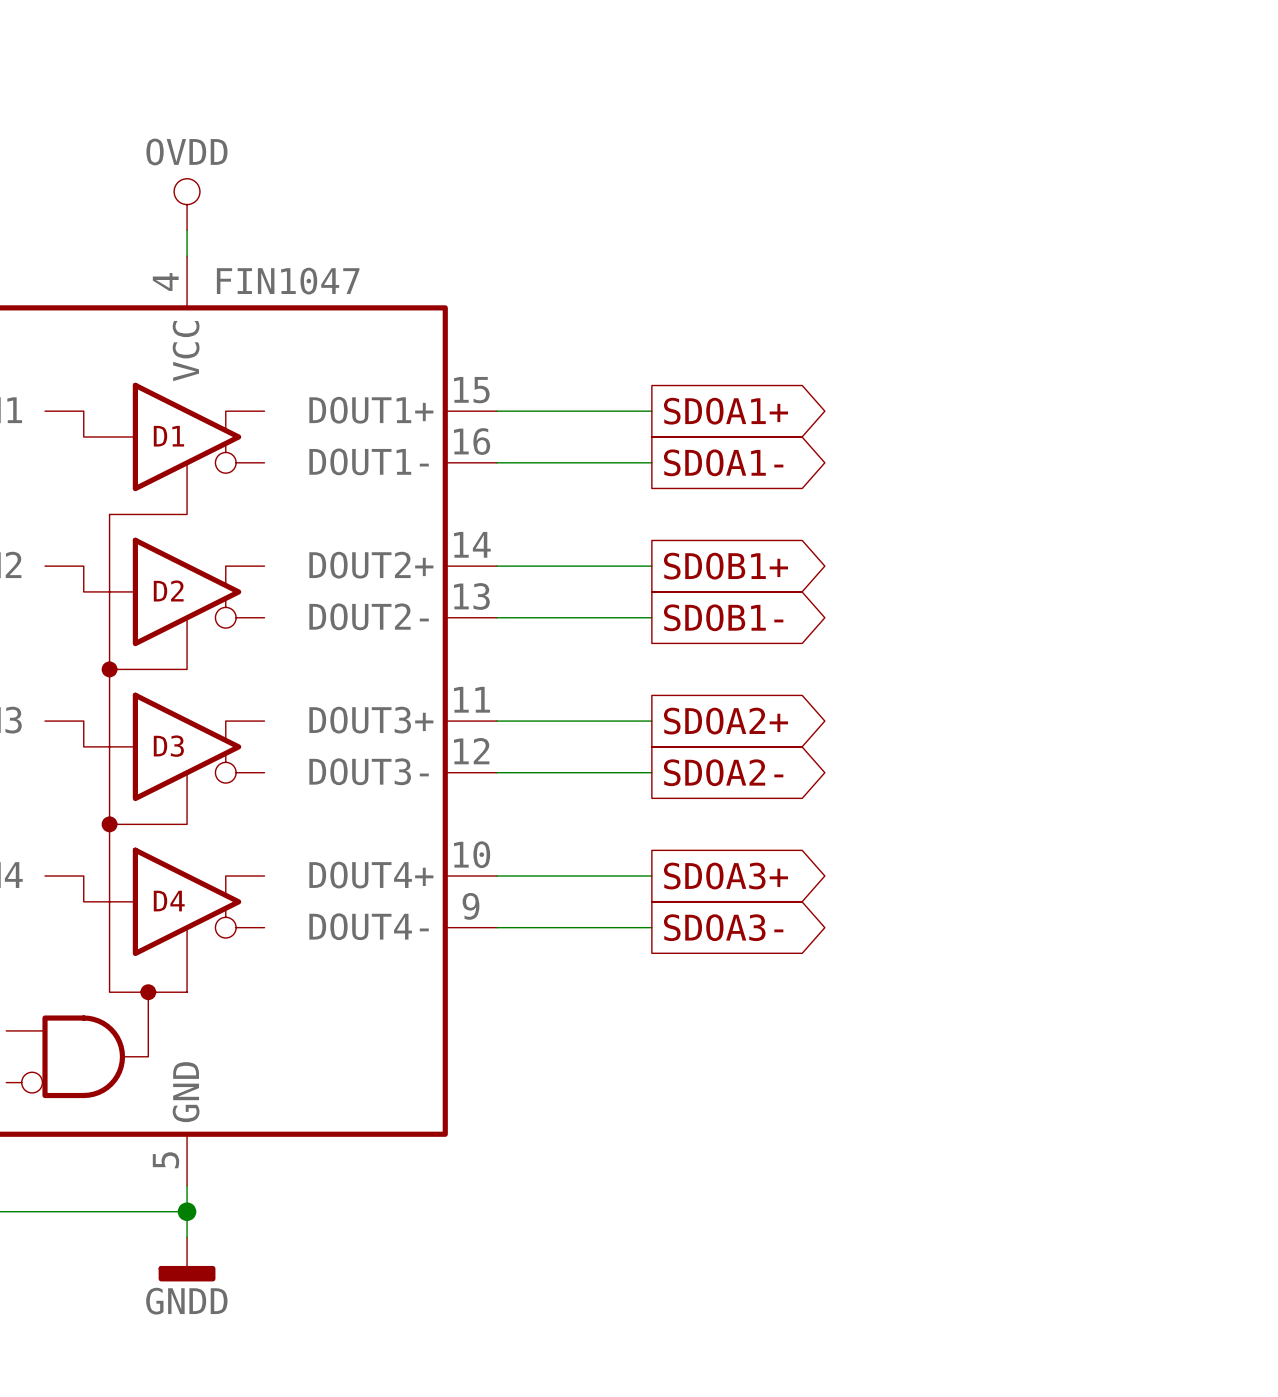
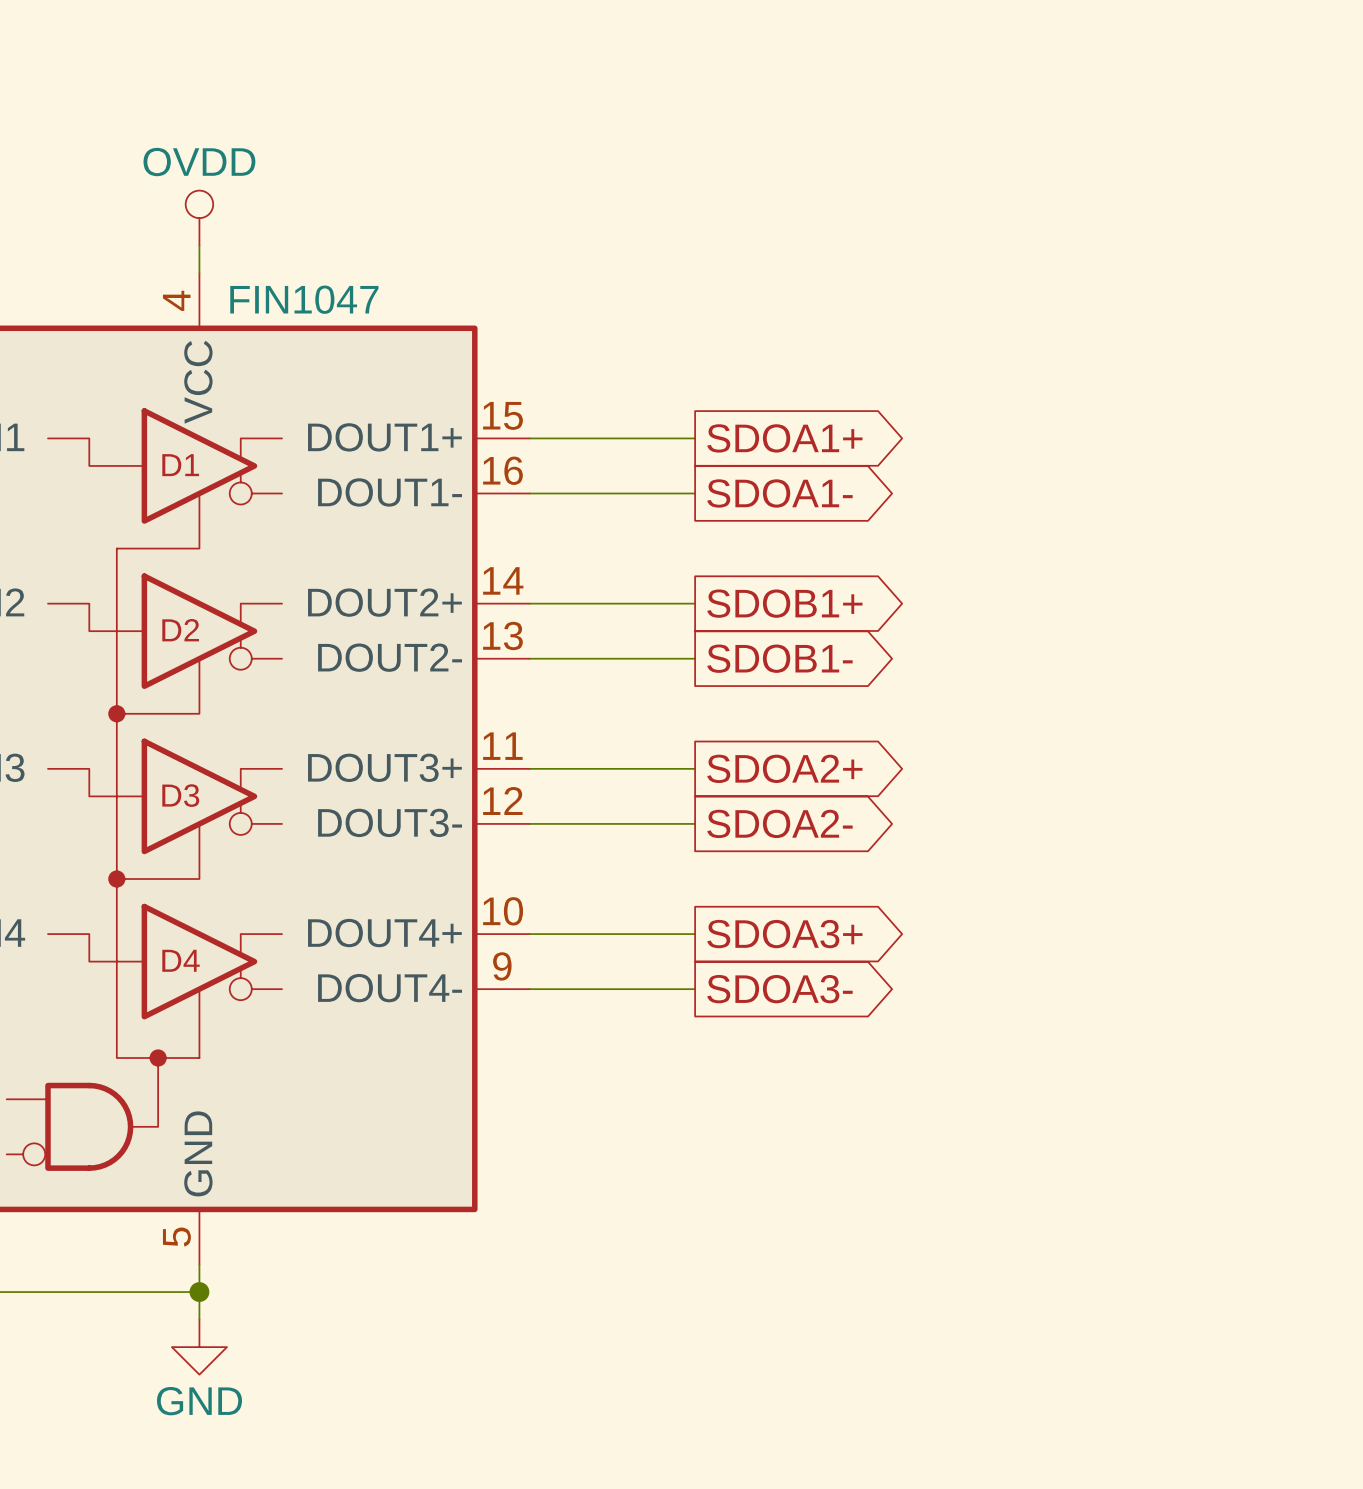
power symbol: GNDD (187, 1259) -> GND (199, 1347)

